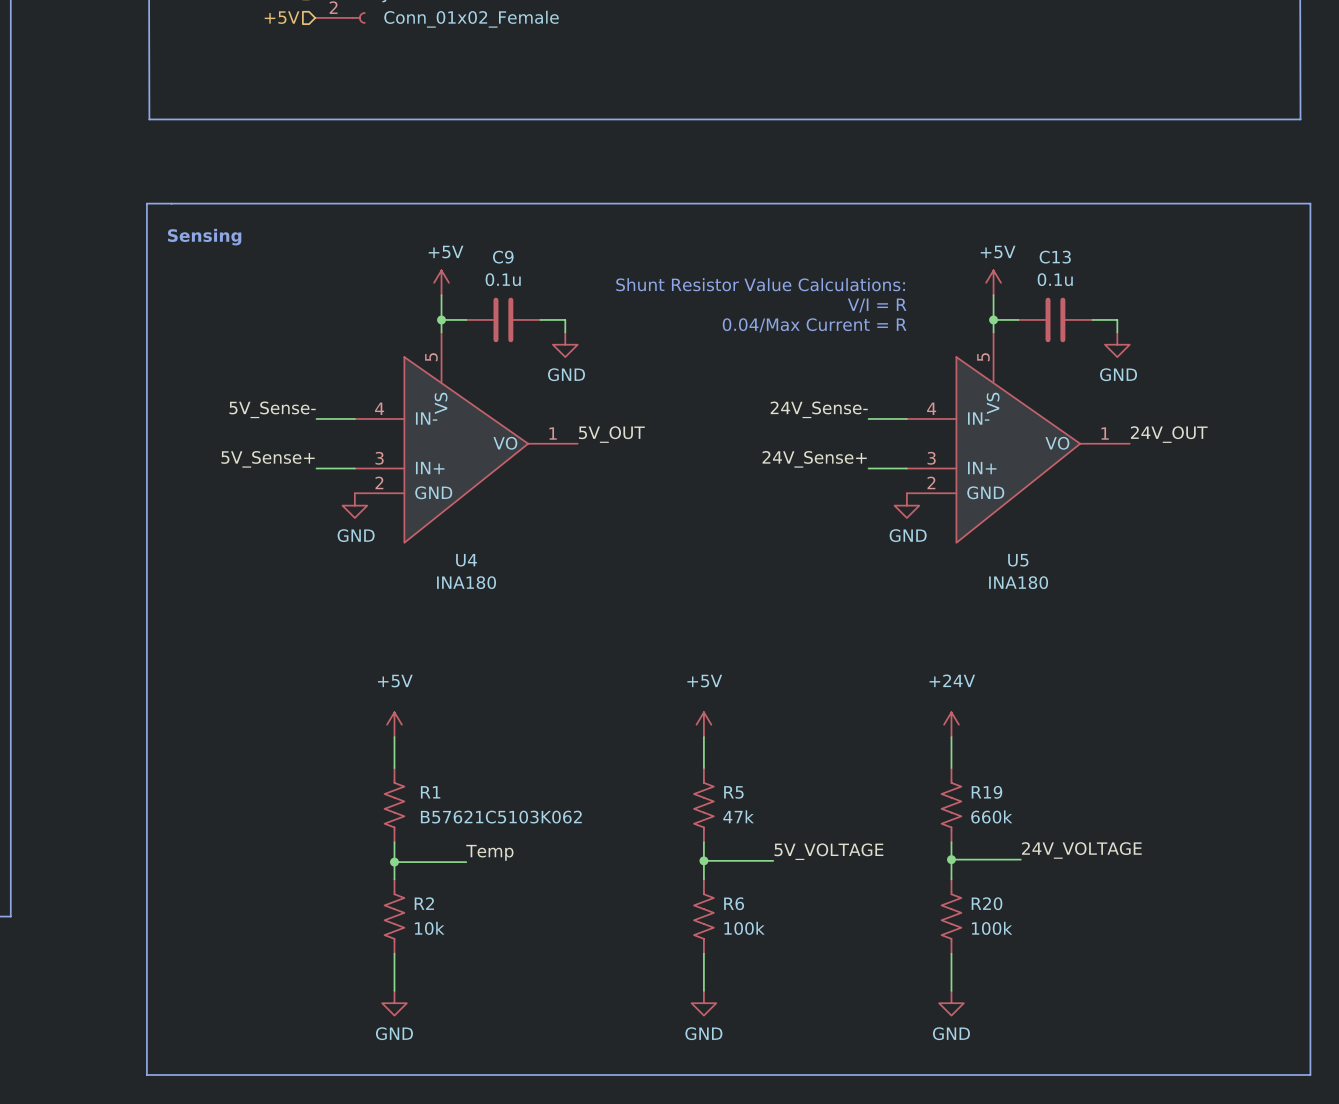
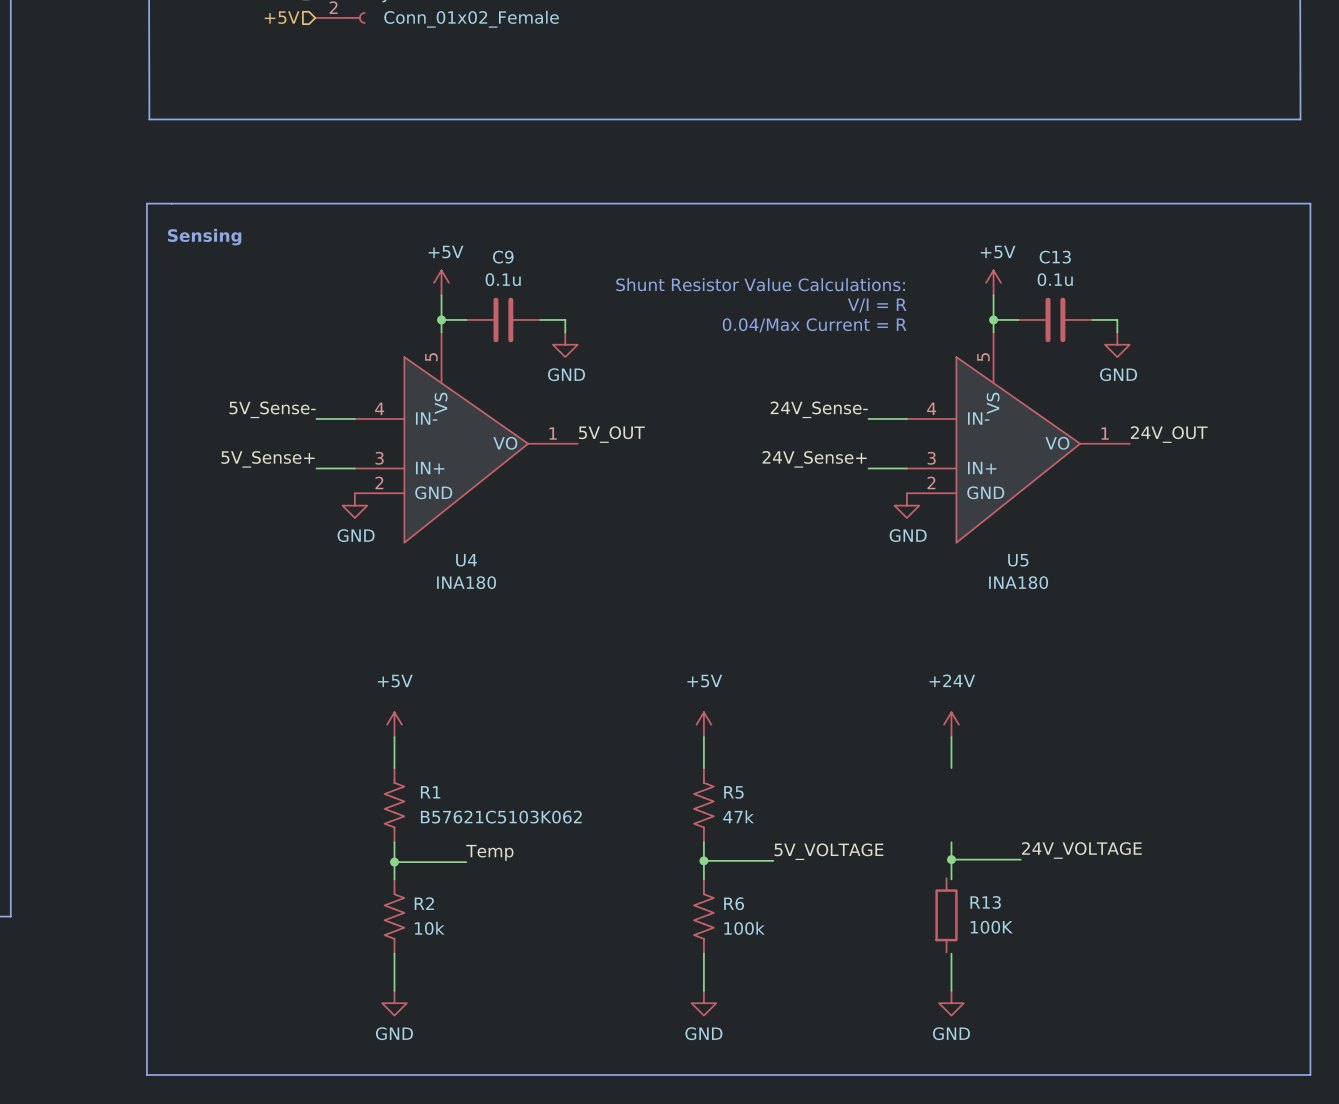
R19: 660k (951, 805) -> none
R13: none -> 100K (946, 915)
R20: 100k (951, 916) -> none

